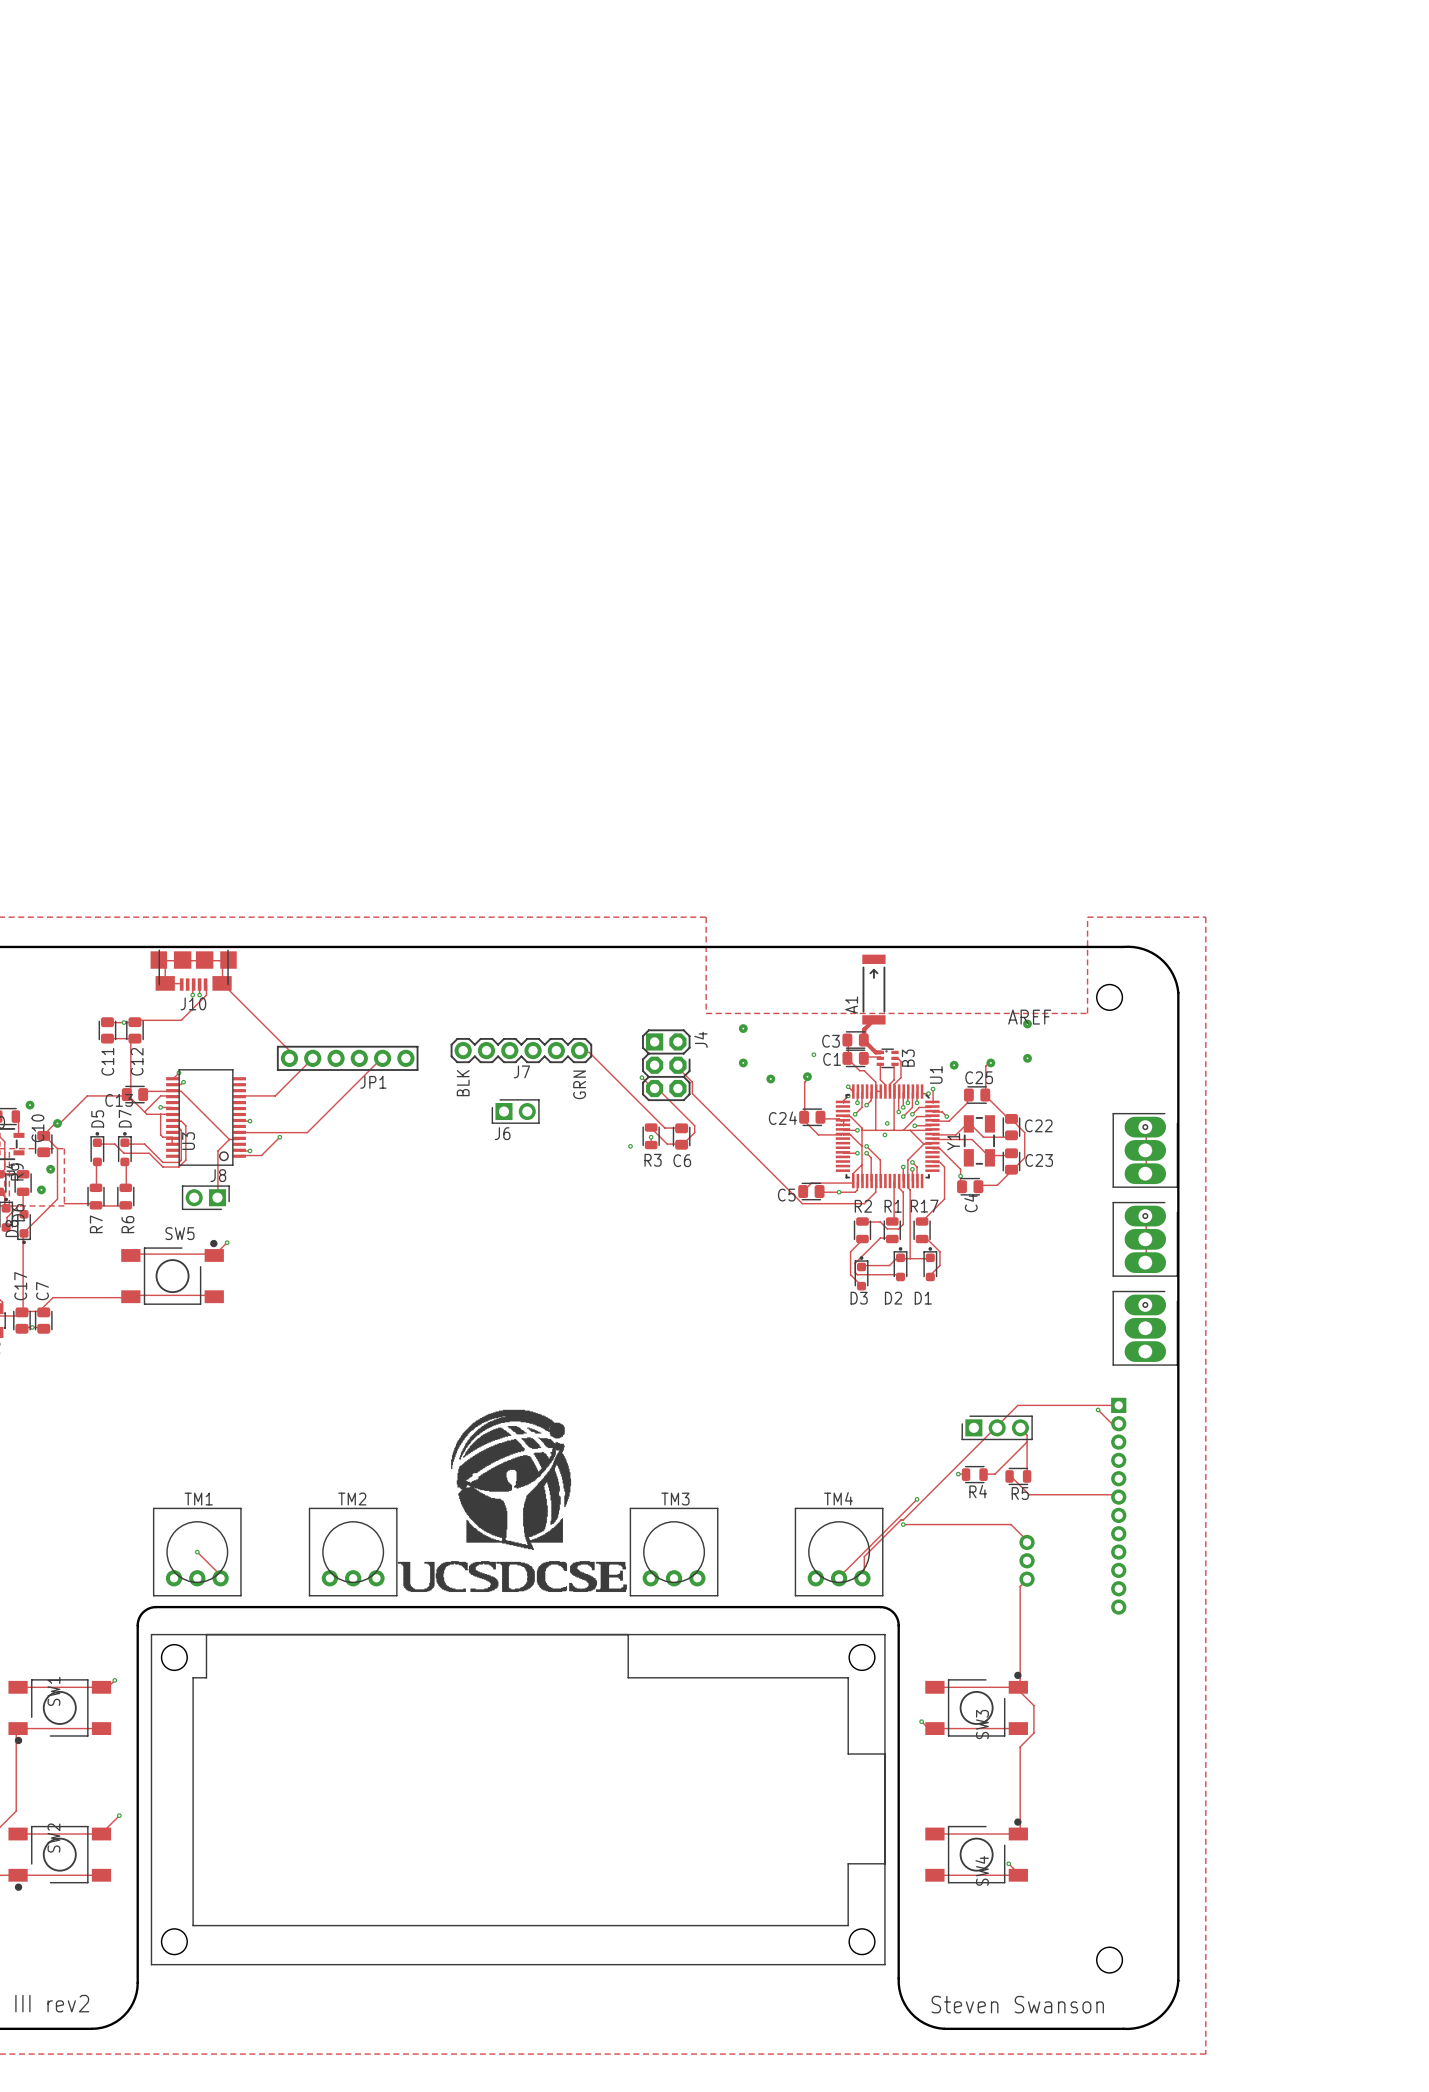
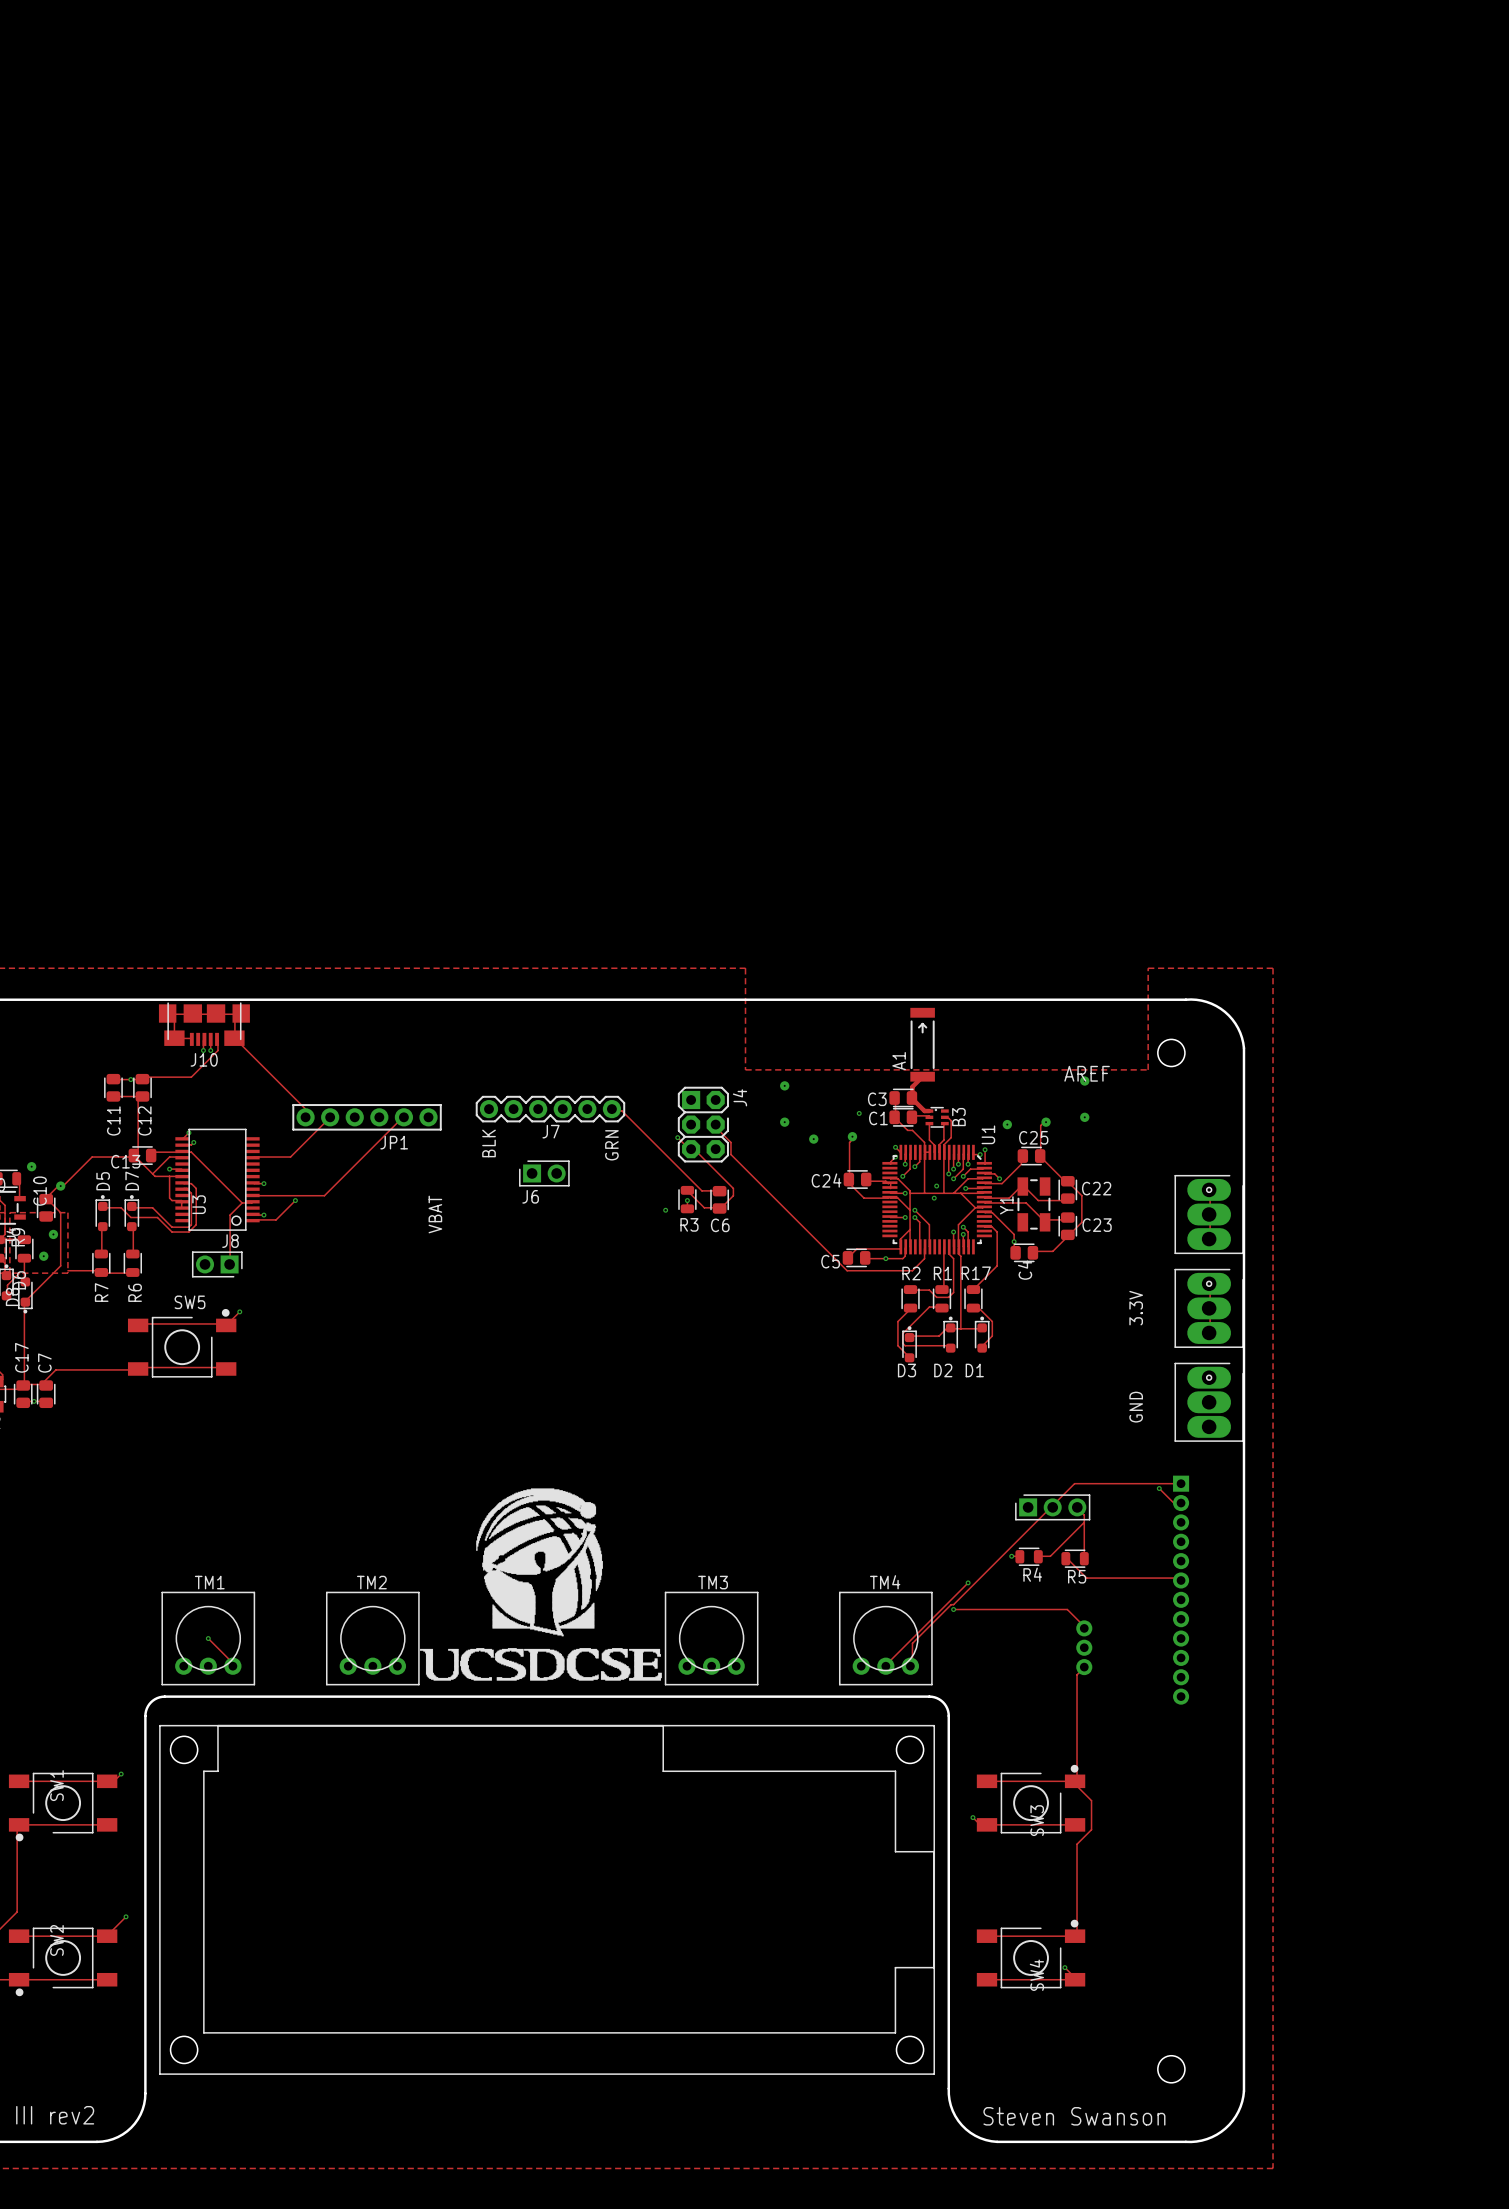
VBAT name: none -> VBAT (435, 1214)
3.3V name: none -> 3.3V (1136, 1308)
GND name: none -> GND (1136, 1407)

